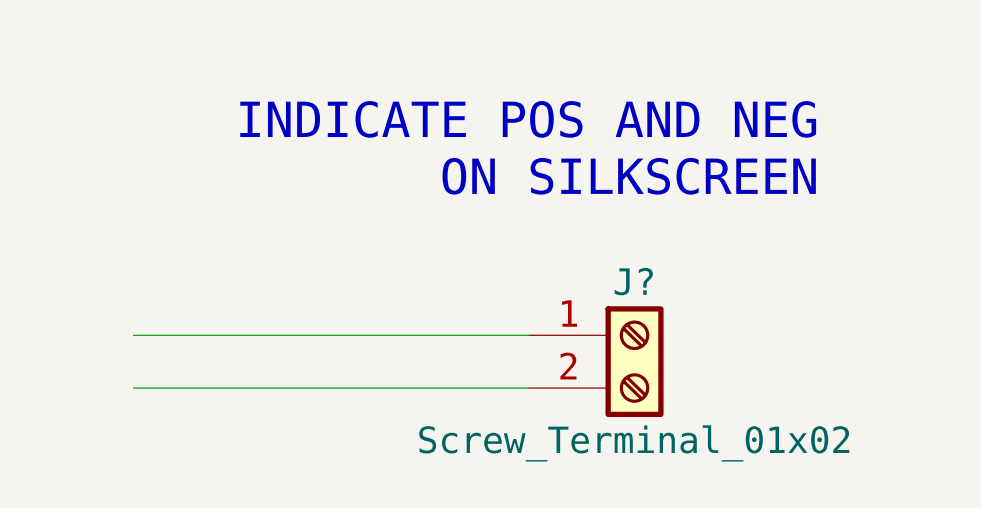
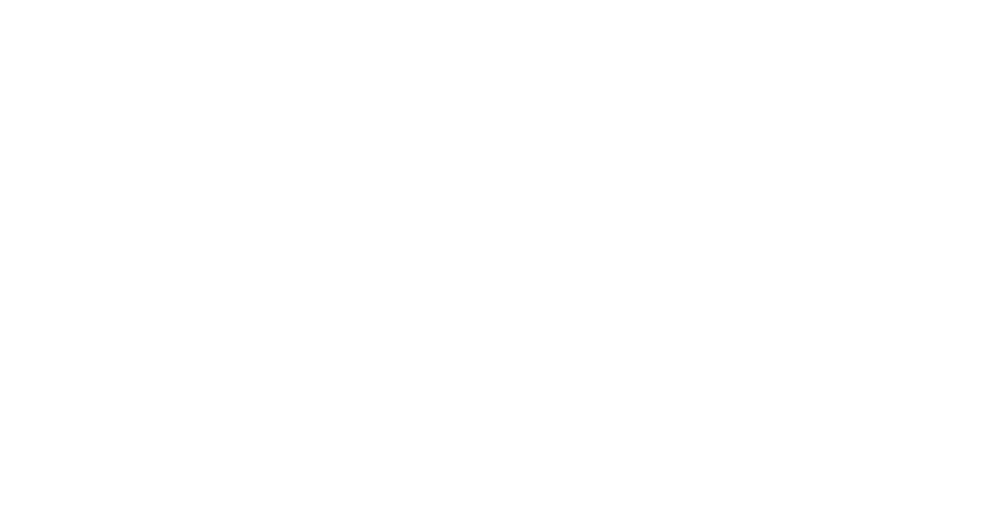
text: INDICATE POS AND NEG (528, 119) -> none
text: ON SILKSCREEN (629, 176) -> none
wire: (133, 335) (529, 335) -> none
J?: Screw_Terminal_01x02 (596, 361) -> none
wire: (133, 388) (529, 388) -> none

